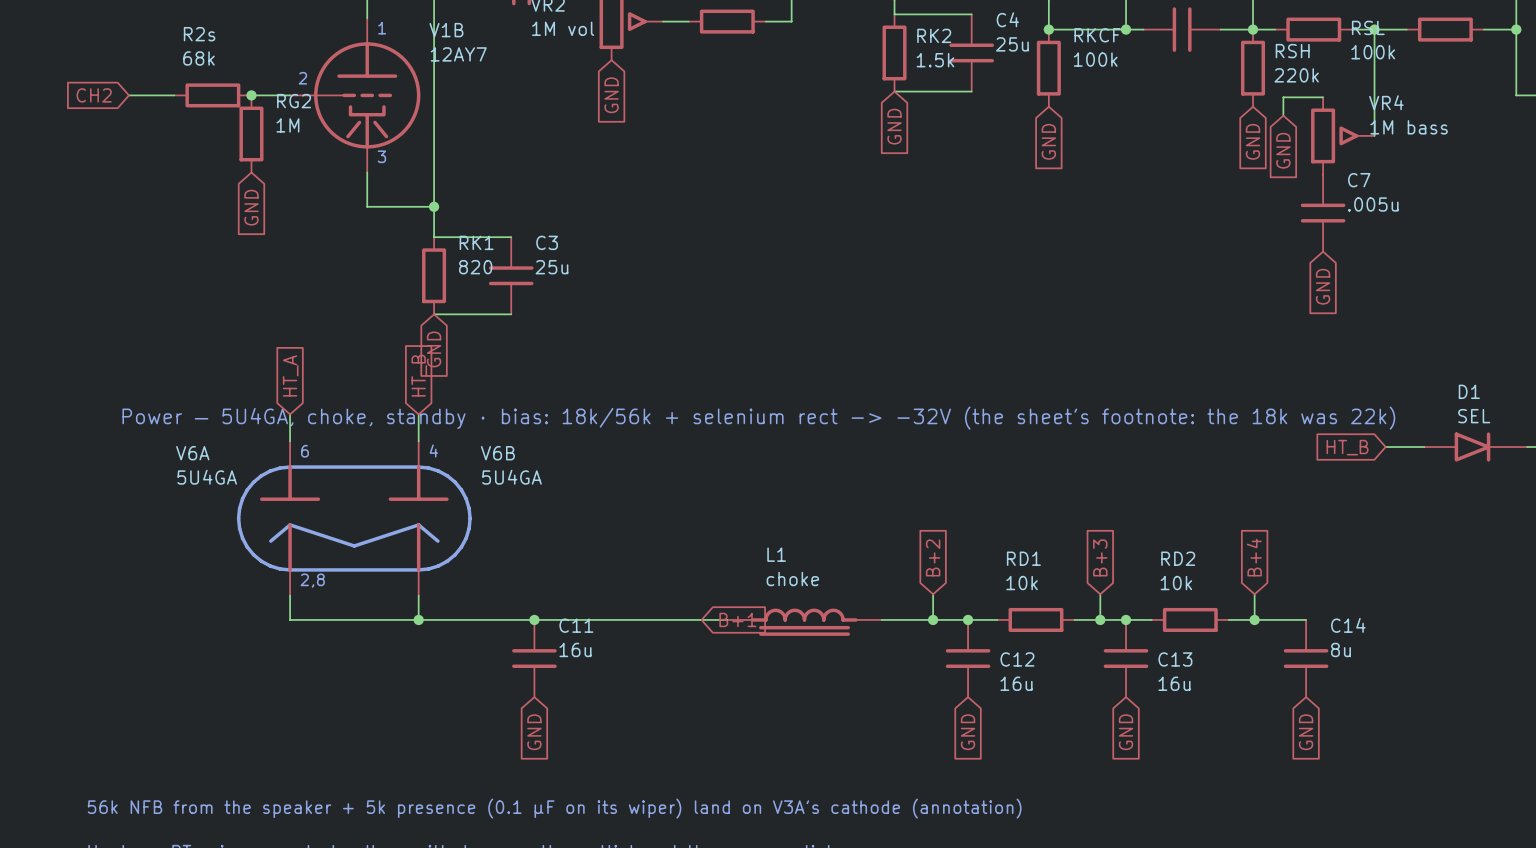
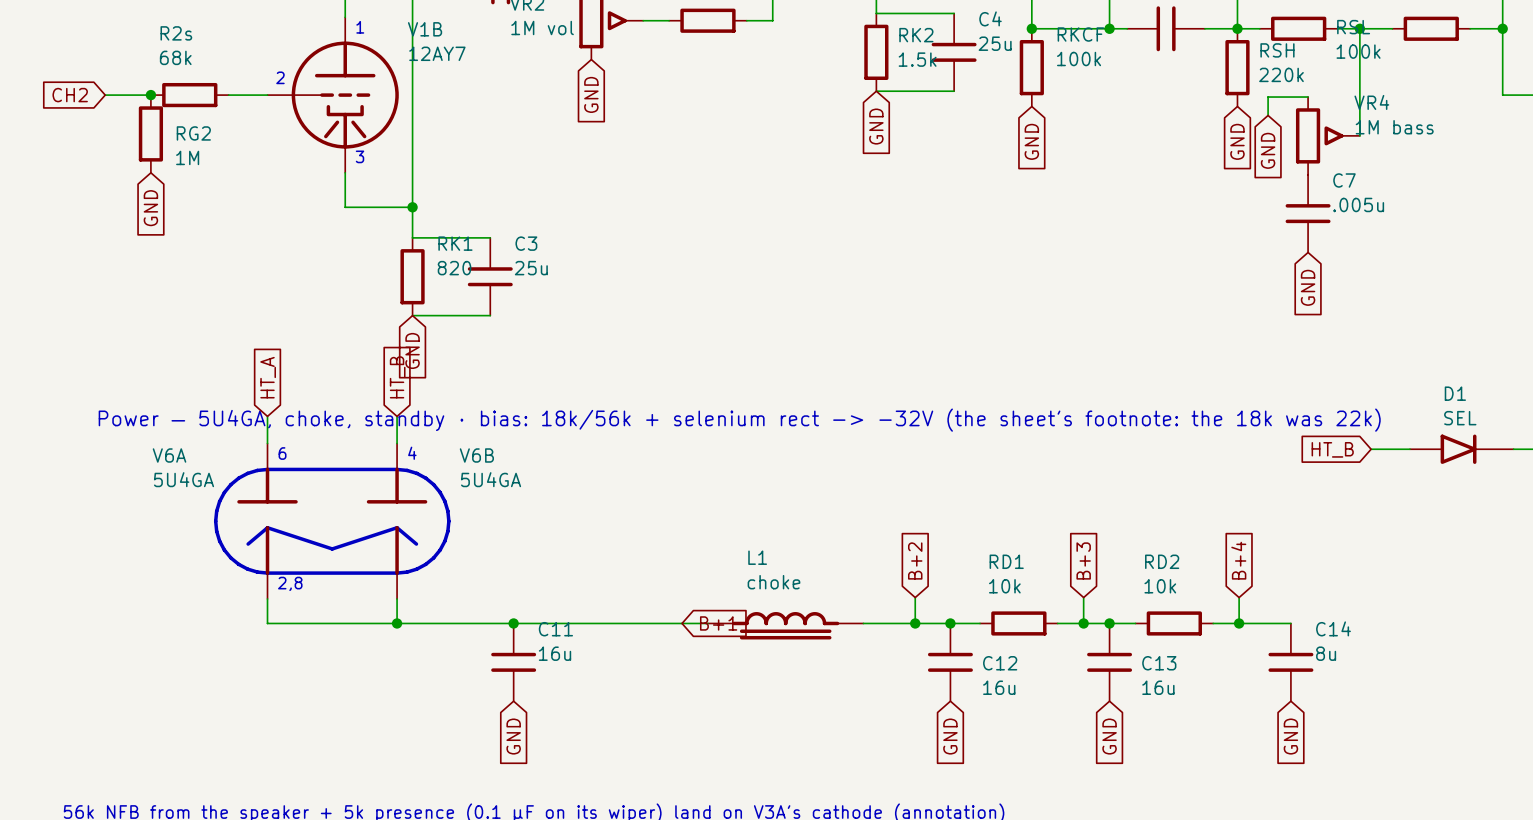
junction: none -> (150, 95)
junction: (251, 95) -> none
RG2 name position: RG2 (294, 101) -> RG2 (193, 133)
RG2 value position: 1M (287, 125) -> 1M (187, 157)
RG2 position: (251, 133) -> (150, 133)
global label position: GND (251, 207) -> GND (150, 208)

